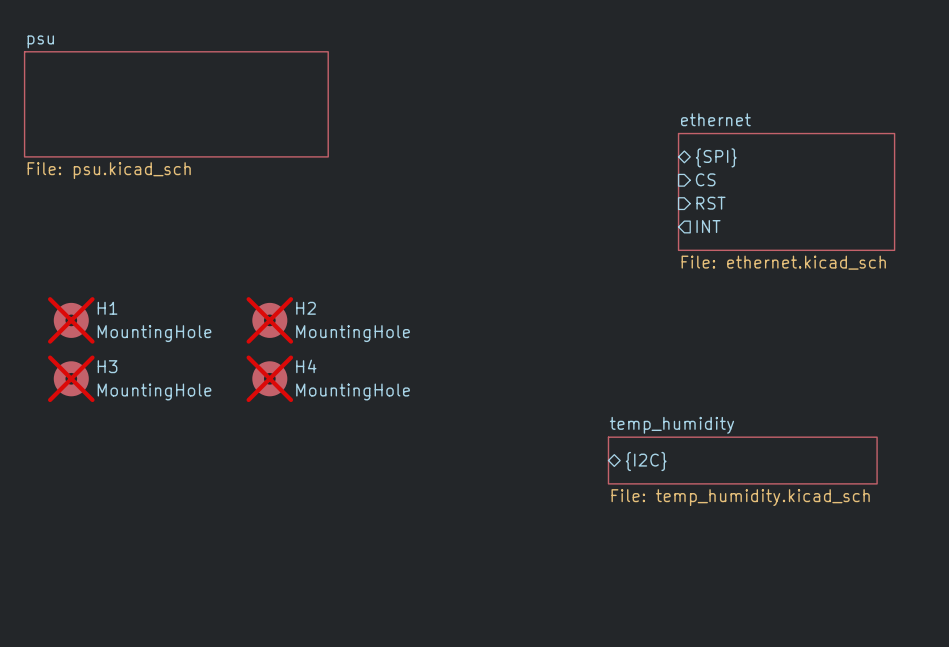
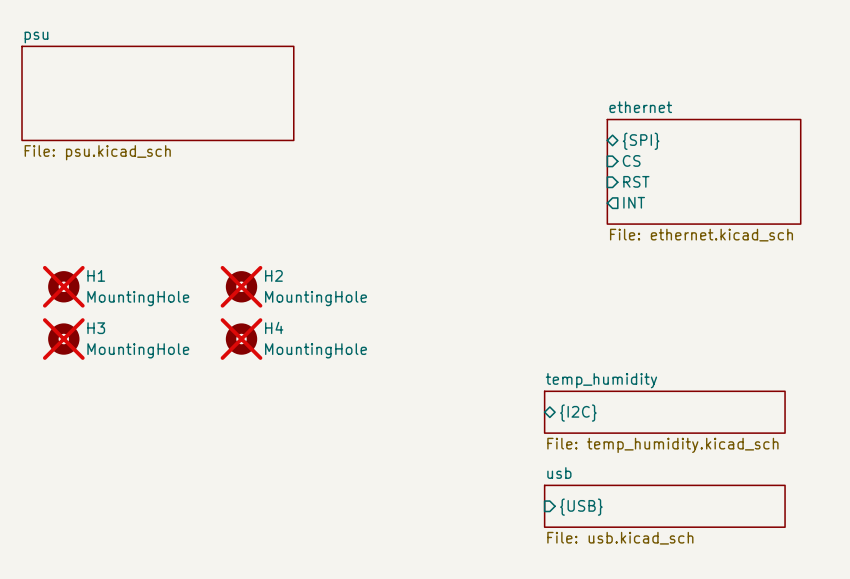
sheet usb: none -> File: usb.kicad_sch (664, 506)
sheet pin: none -> {USB} (581, 507)

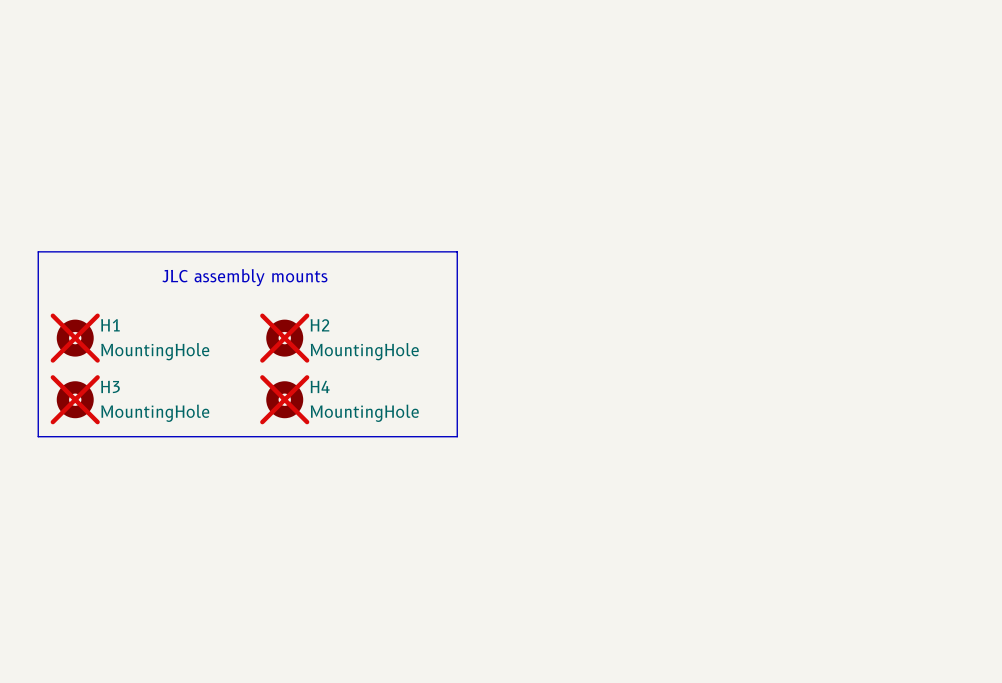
sheet psu: File: psu.kicad_sch (157, 93) -> none
sheet pin: {SPI} (641, 141) -> none
sheet pin: CS (631, 160) -> none
sheet ethernet: File: ethernet.kicad_sch (704, 171) -> none
sheet pin: RST (636, 181) -> none
sheet pin: INT (634, 202) -> none
line: none -> (38, 251) (457, 251) (457, 436) (38, 436) (38, 251)
text: none -> JLC assembly mounts (244, 277)
sheet temp_humidity: File: temp_humidity.kicad_sch (664, 412) -> none
sheet pin: {I2C} (578, 413) -> none
sheet usb: File: usb.kicad_sch (664, 506) -> none
sheet pin: {USB} (581, 507) -> none

